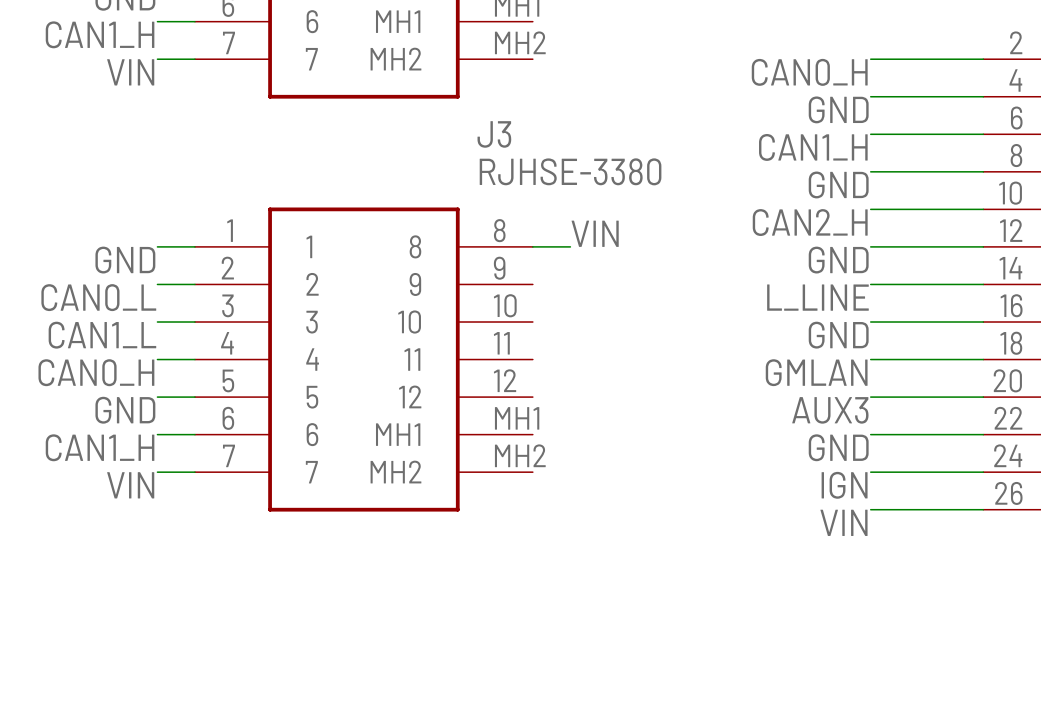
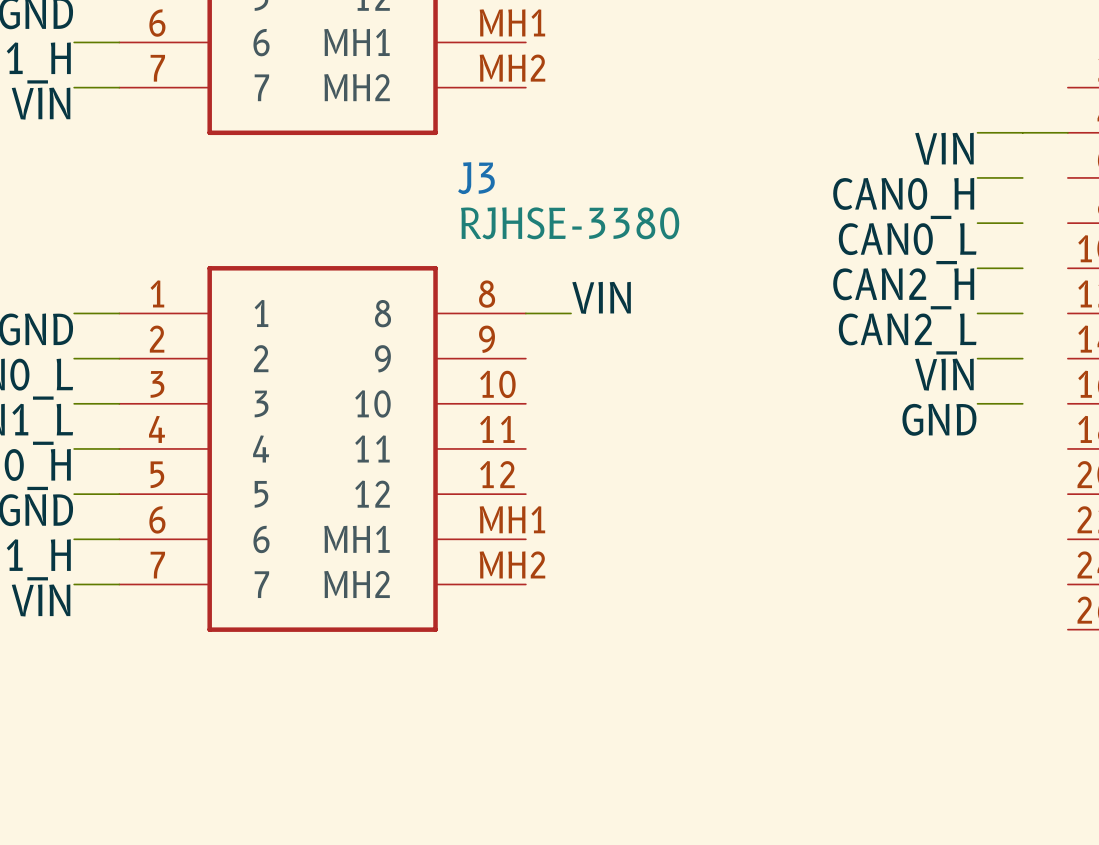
wire: (870, 59) (983, 59) -> none
label position: CAN0_H (809, 72) -> CAN0_H (903, 198)
wire: (870, 96) (908, 96) -> none
label: GND (838, 109) -> none
label: none -> VIN (944, 148)
wire: (870, 134) (908, 134) -> none
wire: (945, 134) (983, 134) -> none
label: CAN1_H (813, 147) -> CAN0_L (907, 243)
wire: (870, 171) (908, 171) -> none
wire: (945, 171) (983, 171) -> none
label: GND (838, 184) -> none
wire: (870, 209) (908, 209) -> none
wire: (945, 209) (983, 209) -> none
label position: CAN2_H (810, 222) -> CAN2_H (903, 288)
wire: (870, 246) (908, 246) -> none
wire: (945, 246) (983, 246) -> none
label: GND (838, 260) -> none
label: none -> CAN2_L (907, 334)
wire: (870, 284) (908, 284) -> none
wire: (945, 284) (983, 284) -> none
label: L_LINE (817, 297) -> none
label: none -> VIN (944, 374)
wire: (870, 322) (908, 322) -> none
wire: (945, 322) (983, 322) -> none
label position: GND (838, 335) -> GND (939, 419)
wire: (870, 359) (983, 359) -> none
label: GMLAN (816, 372) -> none
wire: (870, 397) (983, 397) -> none
label: AUX3 (830, 410) -> none
wire: (870, 434) (983, 434) -> none
label: GND (838, 447) -> none
wire: (870, 472) (983, 472) -> none
label: IGN (844, 485) -> none
wire: (870, 509) (983, 509) -> none
label: VIN (843, 522) -> none

